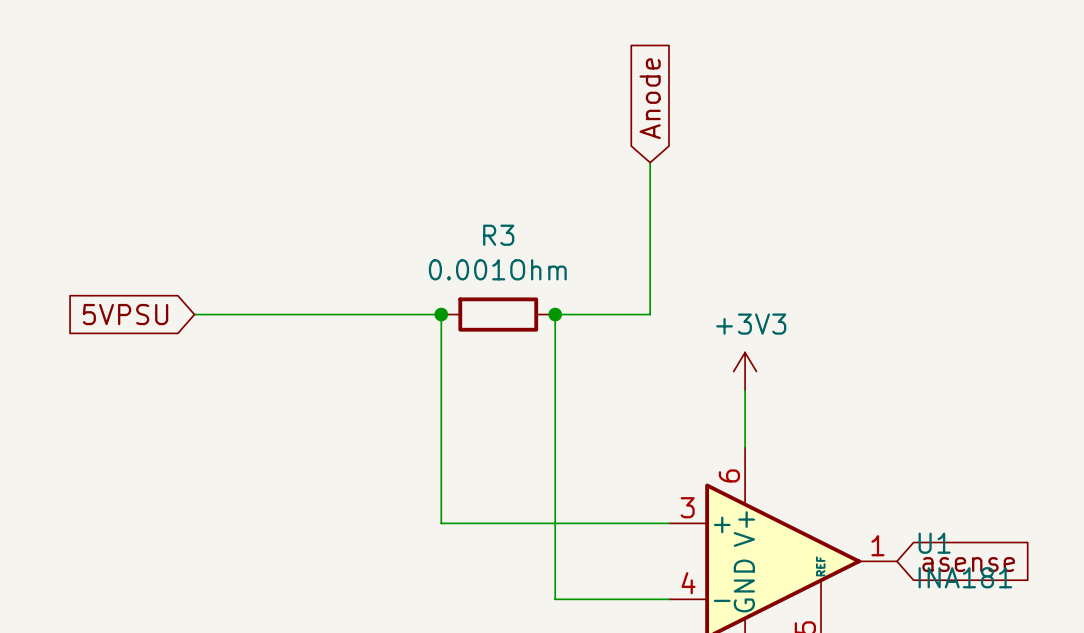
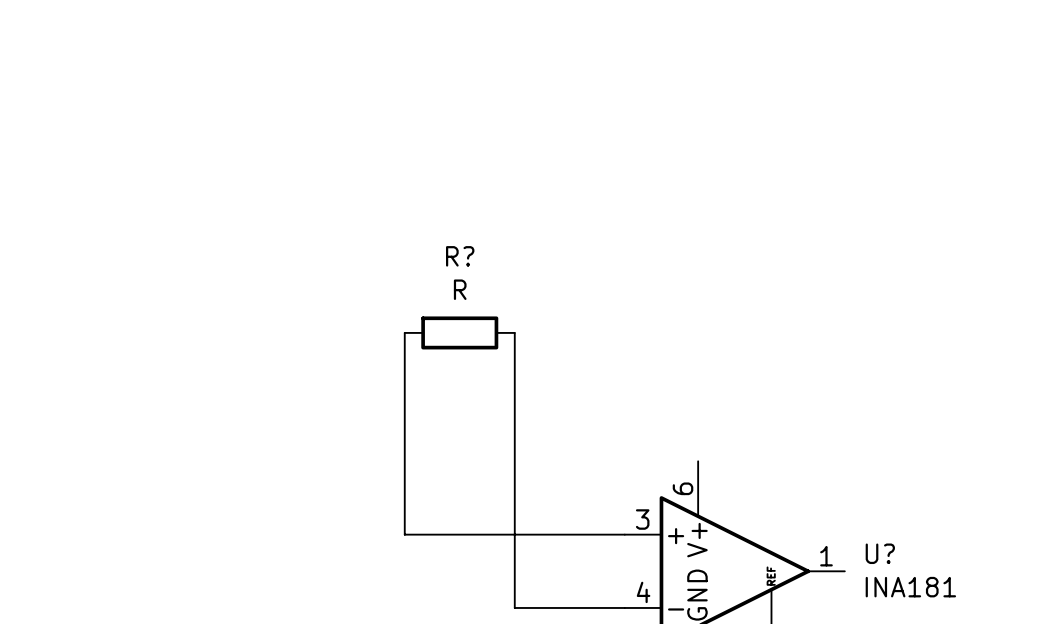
global label: Anode (650, 98) -> none
wire: (650, 162) (650, 314) (555, 314) -> none
R3 name: R3 (498, 235) -> R? (460, 256)
R3 value: 0.001Ohm (497, 269) -> R (460, 289)
global label: 5VPSU (125, 314) -> none
wire: (194, 314) (441, 314) -> none
junction: (441, 314) -> none
junction: (555, 314) -> none
power symbol: +3V3 (745, 371) -> none
wire: (745, 390) (745, 447) -> none
U1 name: U1 (934, 543) -> U? (880, 553)
global label: asense (968, 564) -> none

